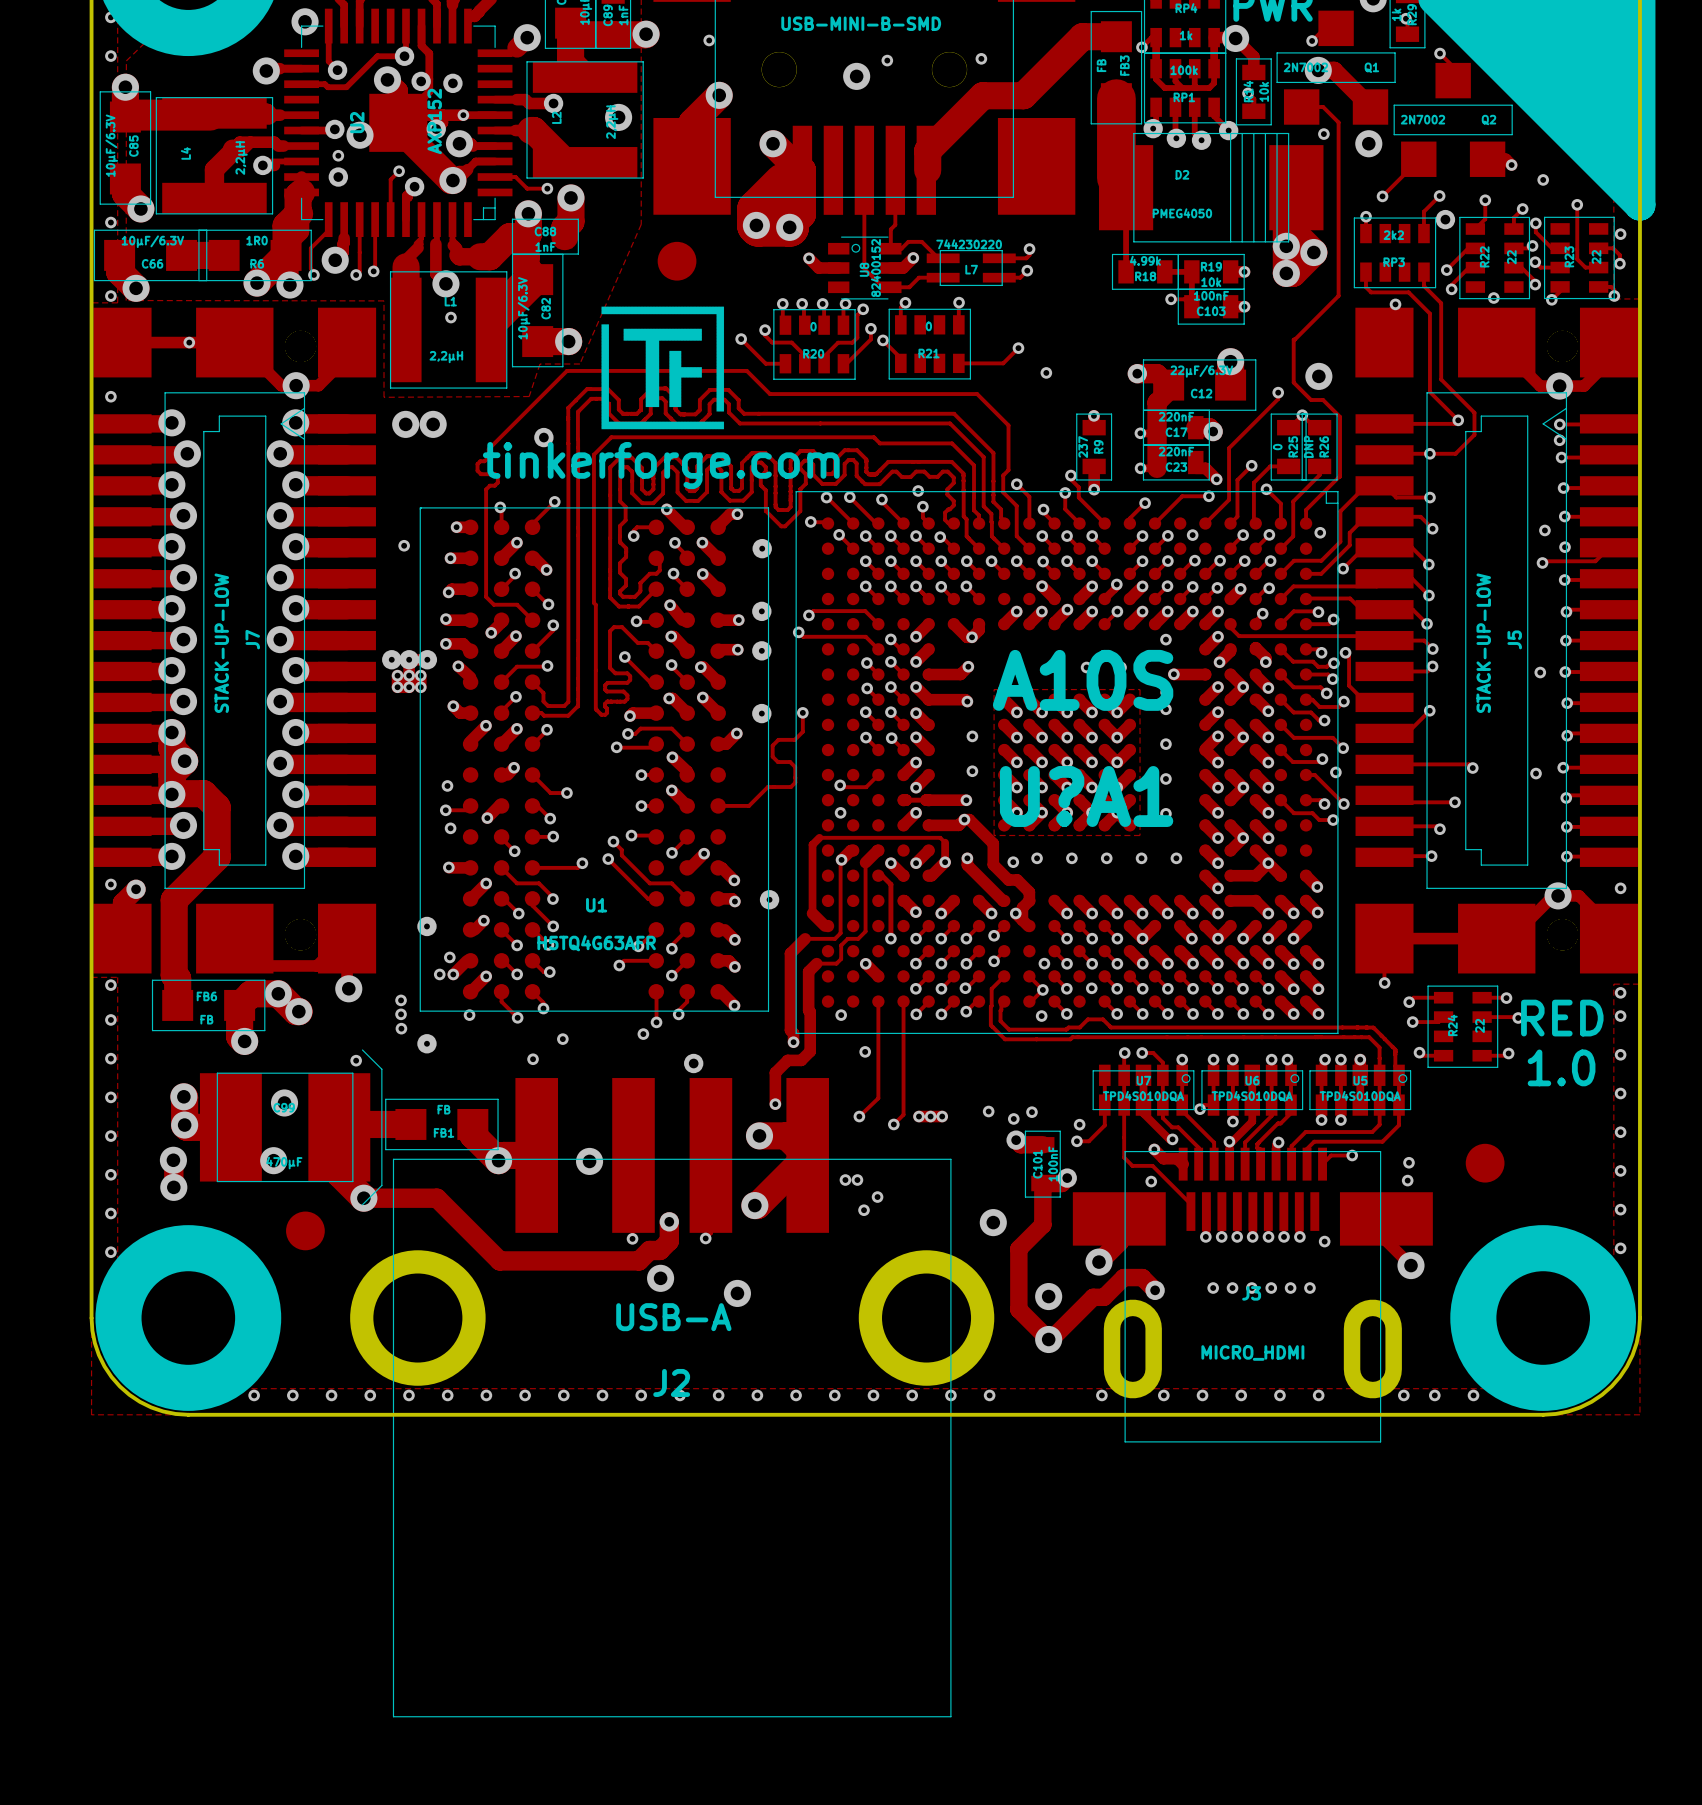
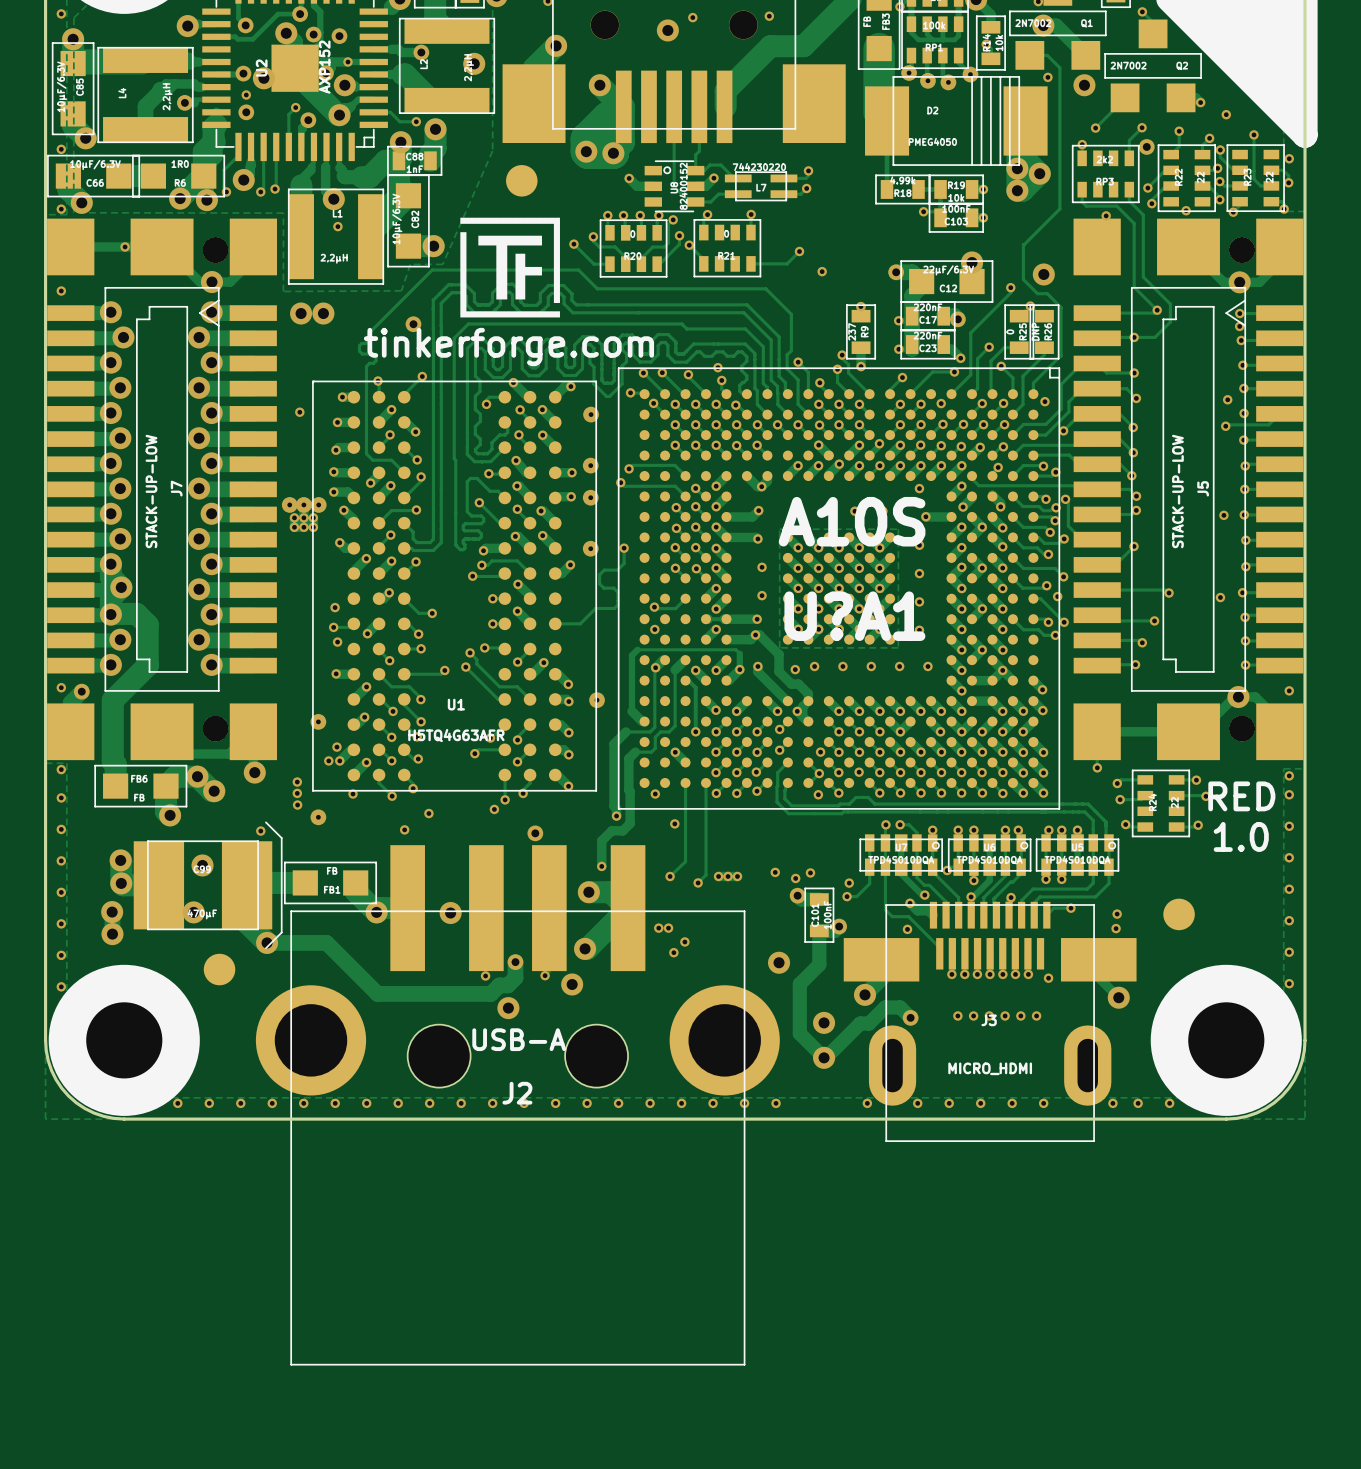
J2 footprint: [350, 1078, 995, 1717] -> [255, 845, 780, 1365]
via position: (737, 1293) -> (572, 984)

